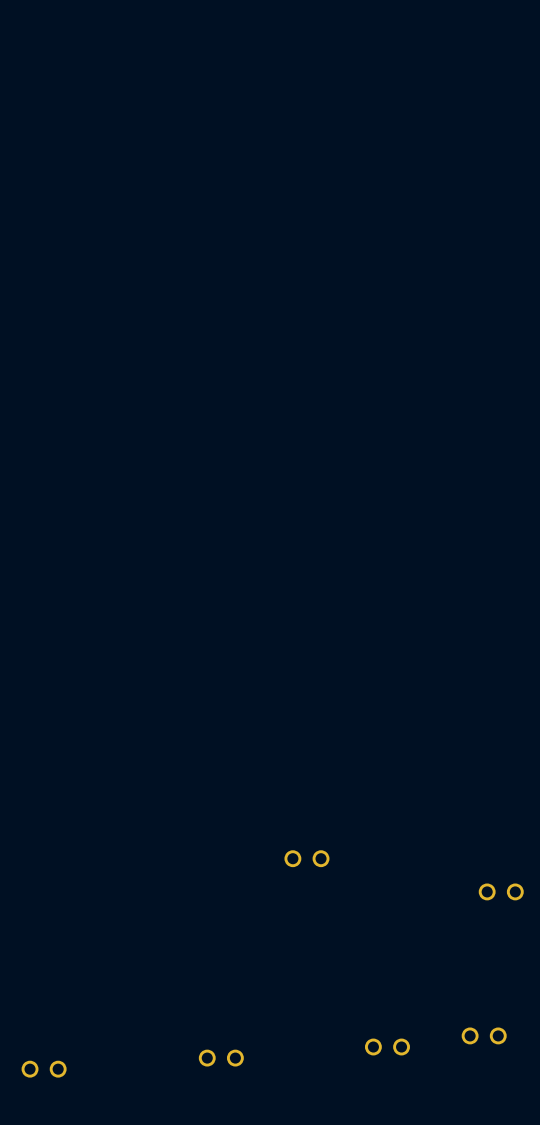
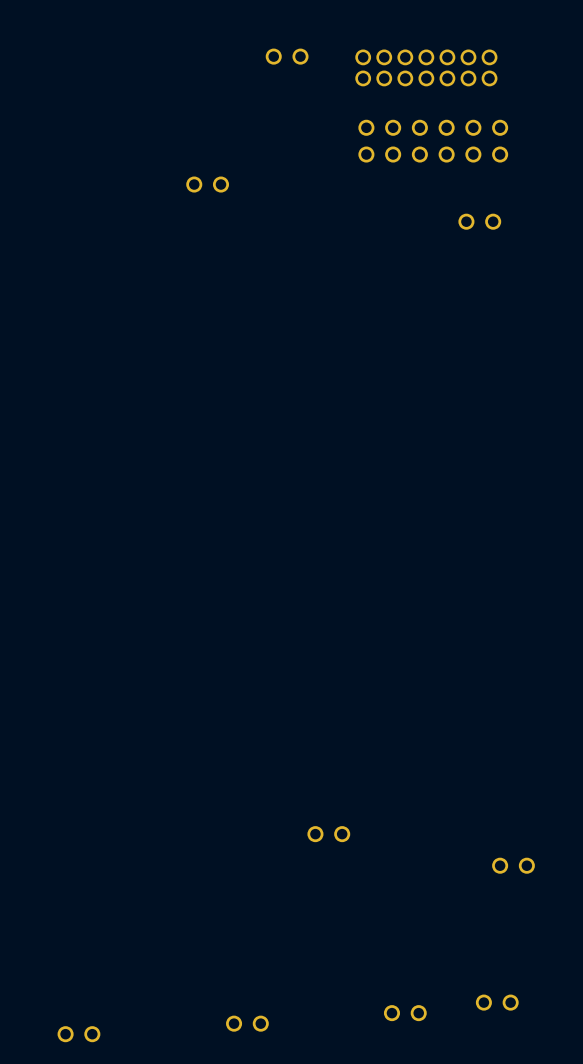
part: none -> (287, 56)
part: none -> (426, 67)
part: none -> (433, 141)
part: none -> (207, 184)
part: none -> (479, 221)

